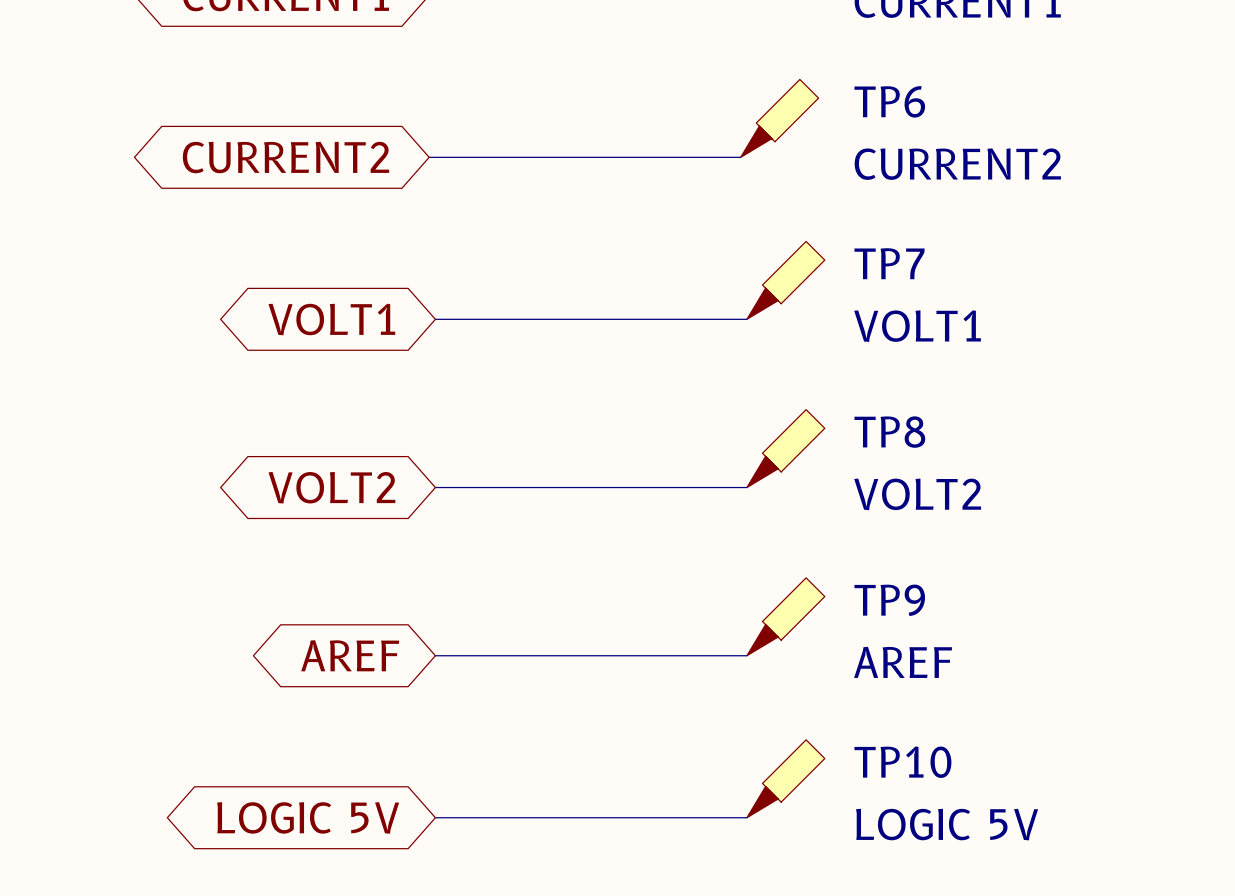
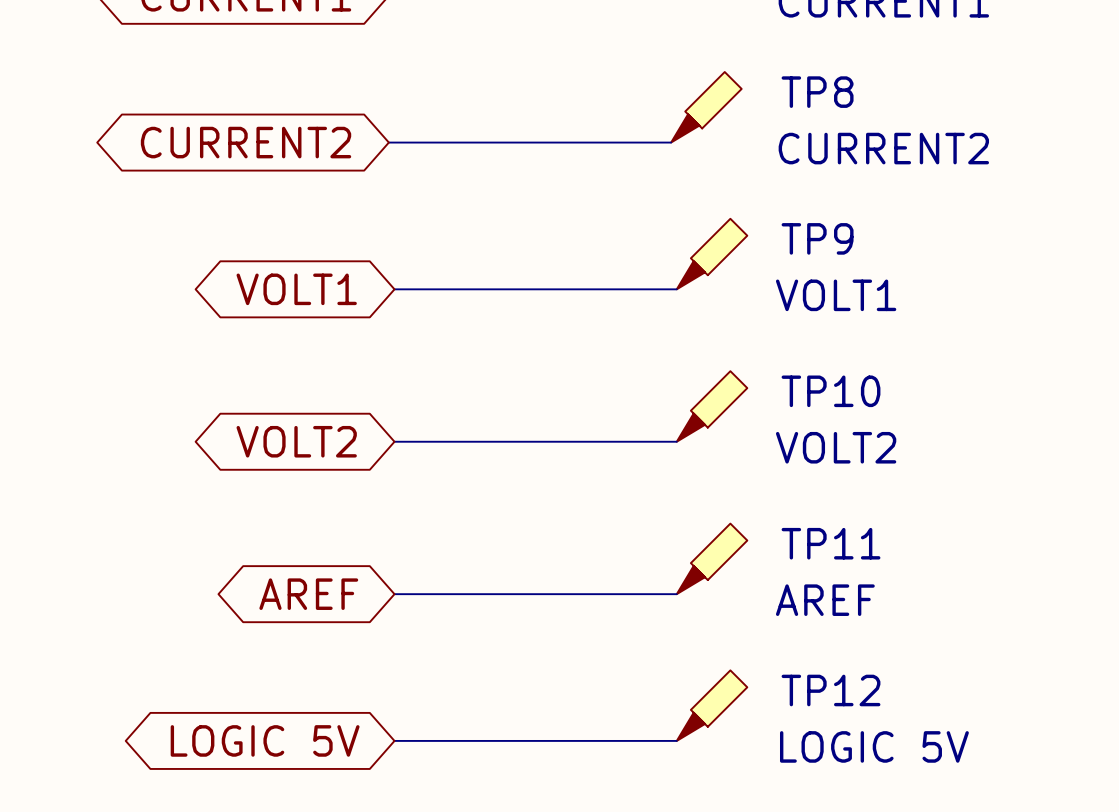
TP6 name: TP6 (889, 101) -> TP8 (817, 92)
TP7 name: TP7 (889, 263) -> TP9 (817, 238)
TP8 name: TP8 (889, 432) -> TP10 (831, 391)
TP9 name: TP9 (889, 600) -> TP11 (831, 543)
TP10 name: TP10 (902, 762) -> TP12 (831, 690)

